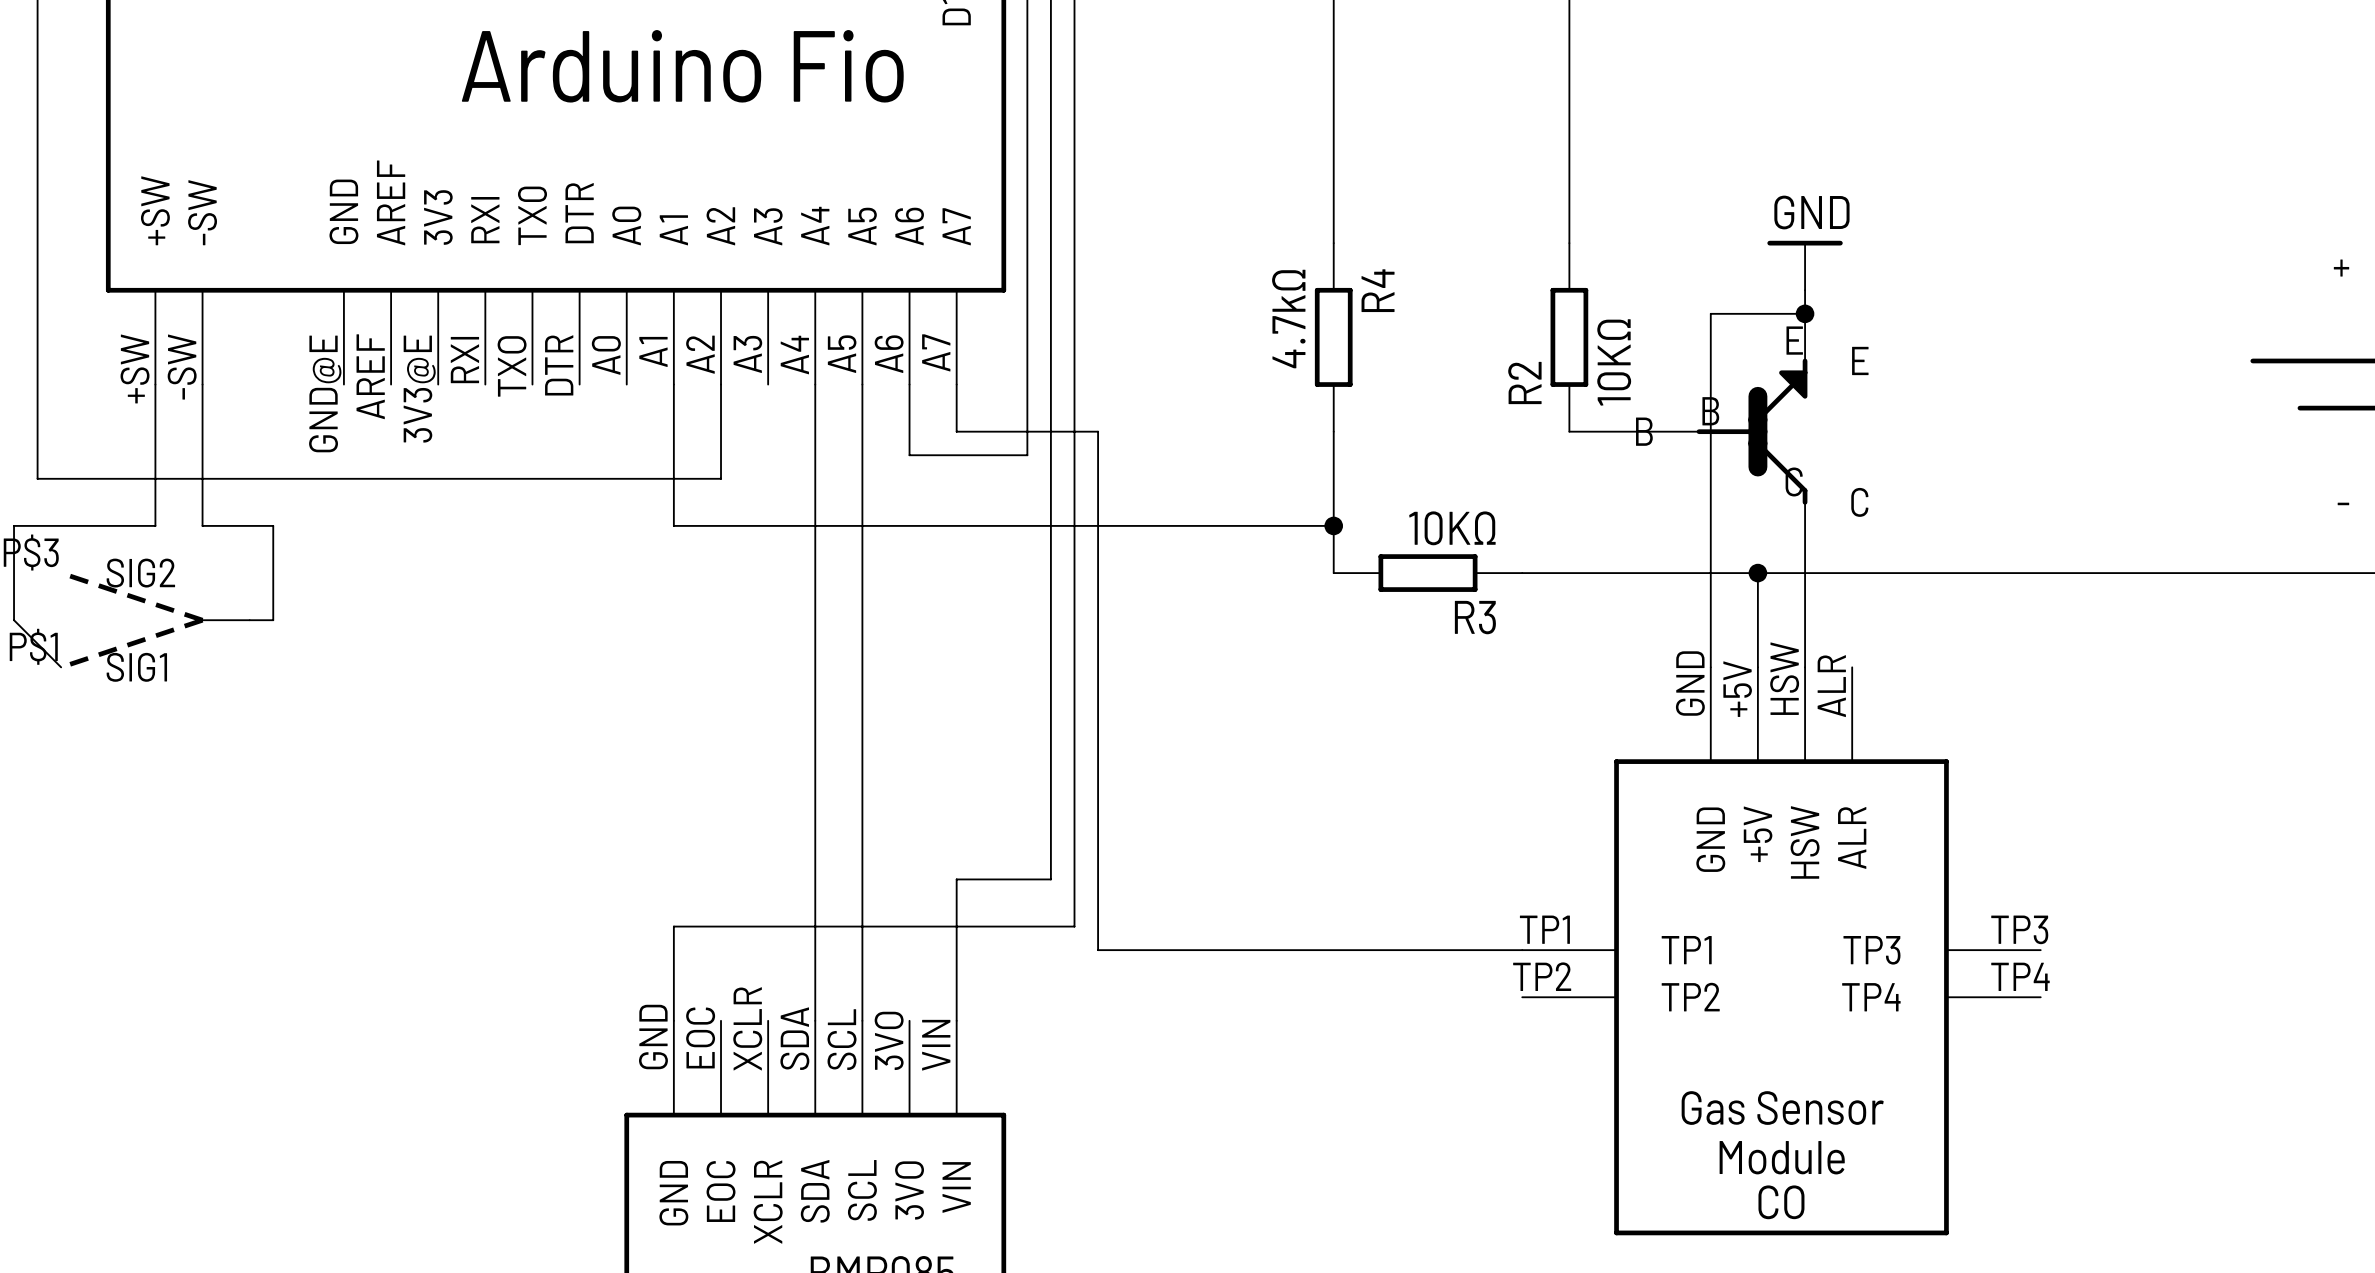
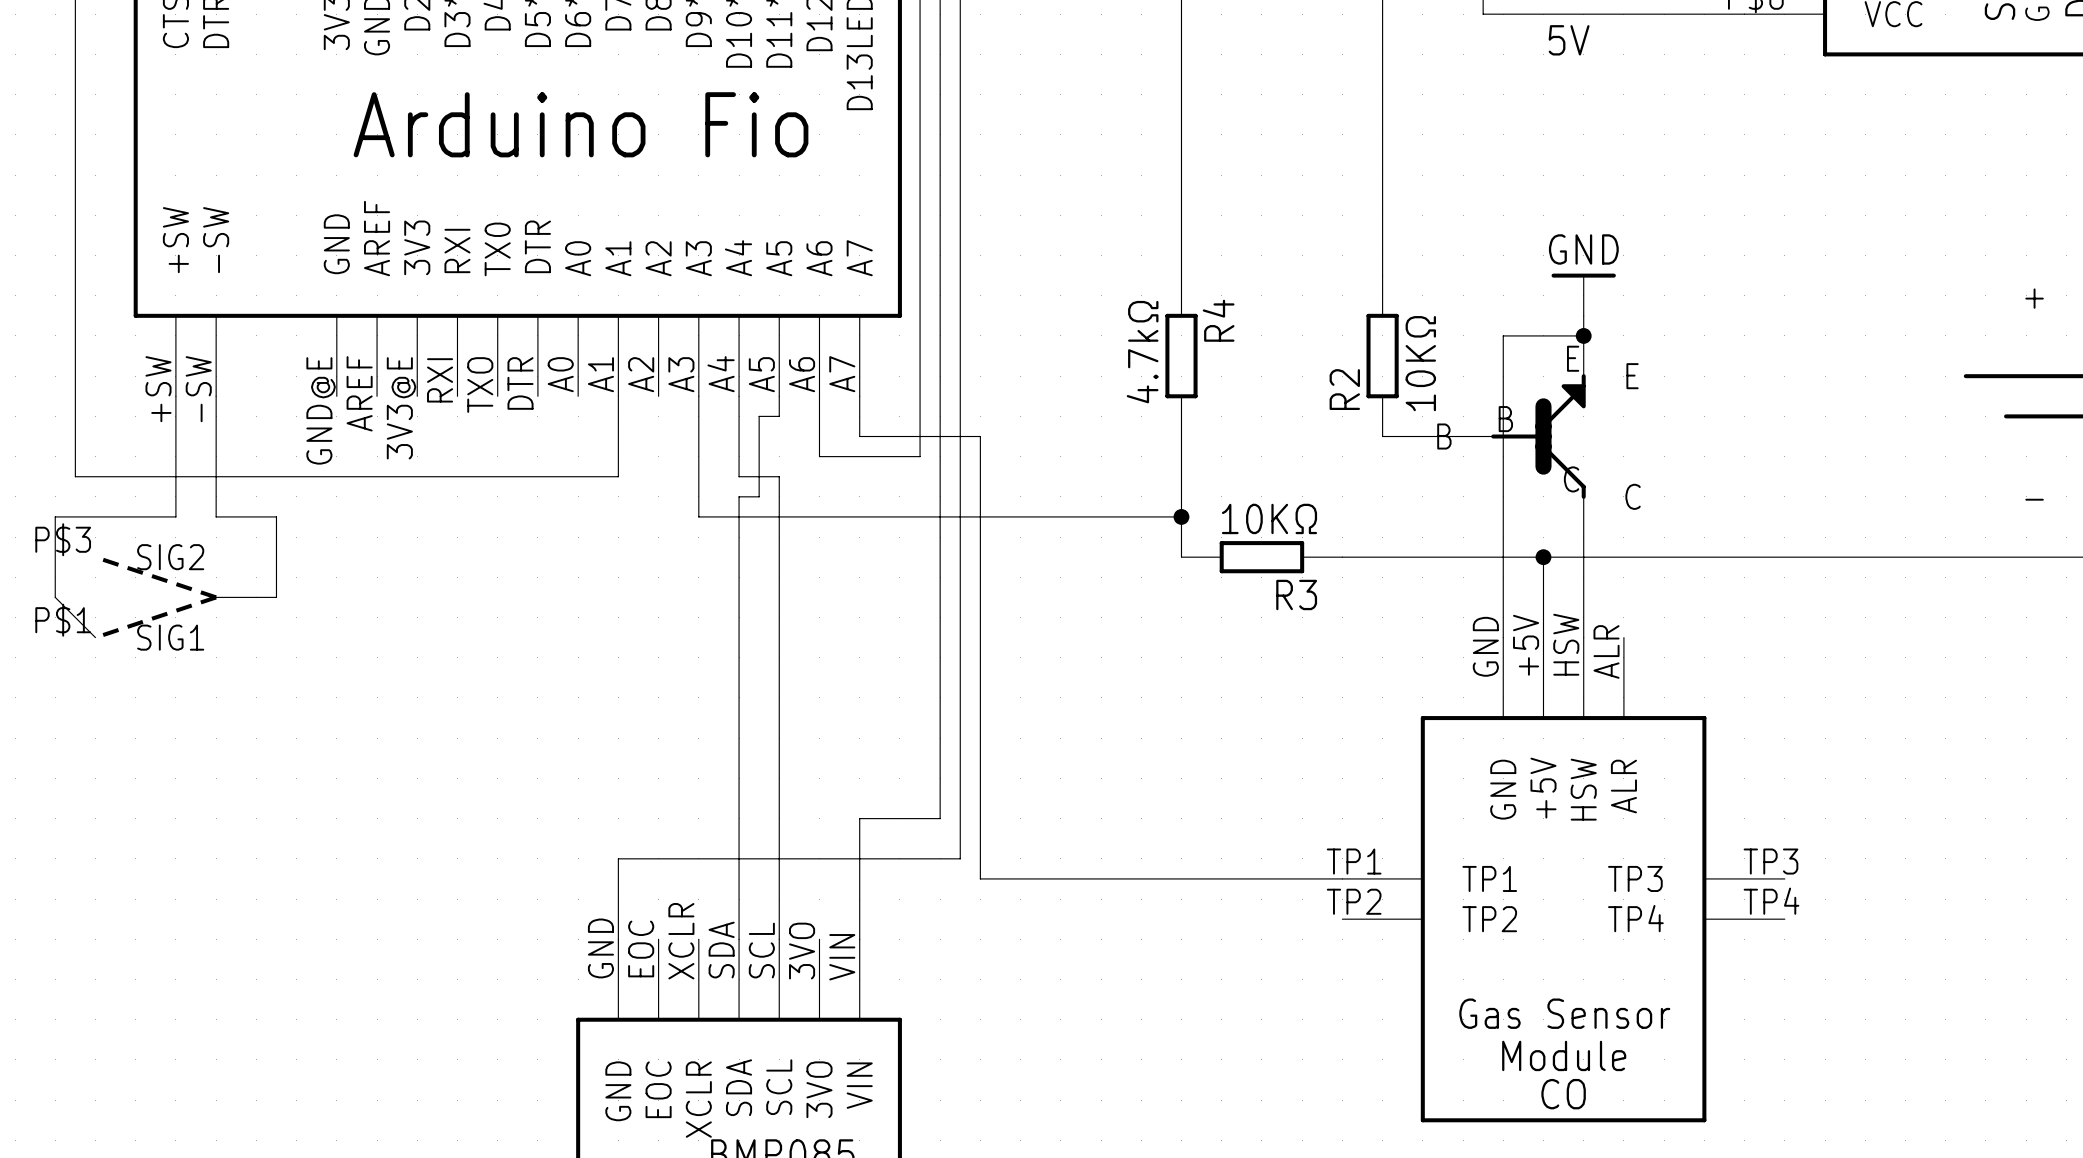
wire: (721, 384) (721, 478) (673, 478) (673, 525) (768, 525) -> (698, 396) (698, 516)
wire: (862, 408) (862, 478) -> (779, 416) (759, 416) (759, 496) (739, 496)
wire: (815, 478) (815, 502) -> (739, 476) (779, 476)

